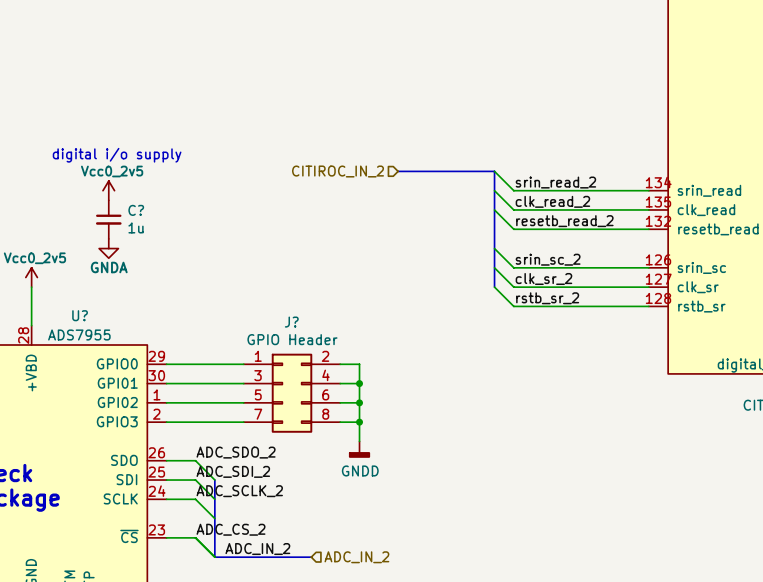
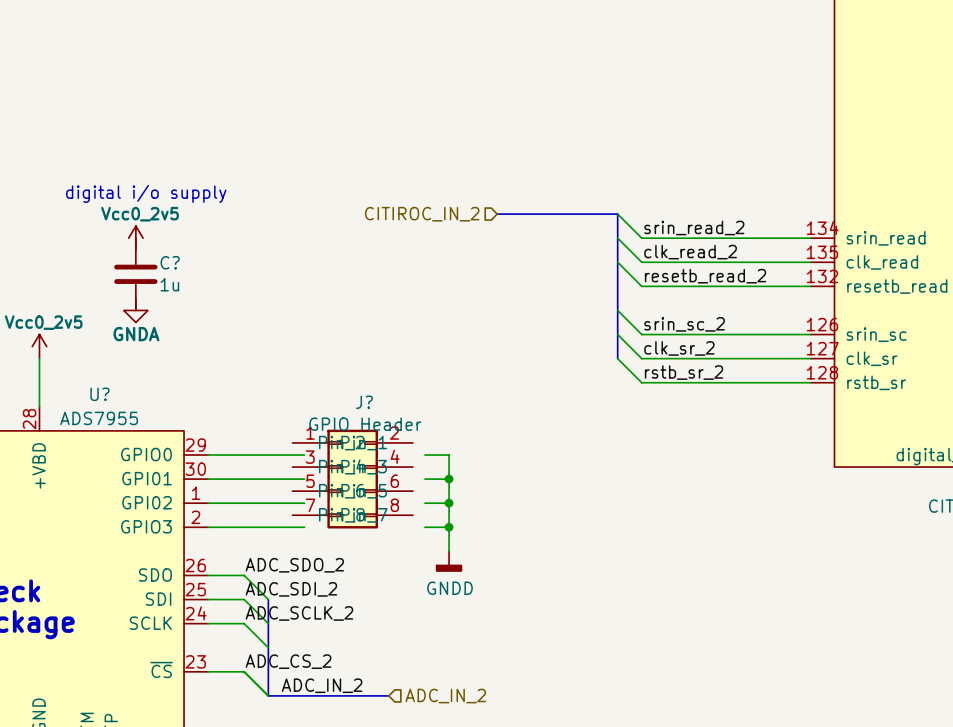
C? symbol: [95, 200, 122, 239] -> [114, 238, 158, 311]
J?: none -> GPIO Header (352, 479)
J?: GPIO Header (292, 393) -> none

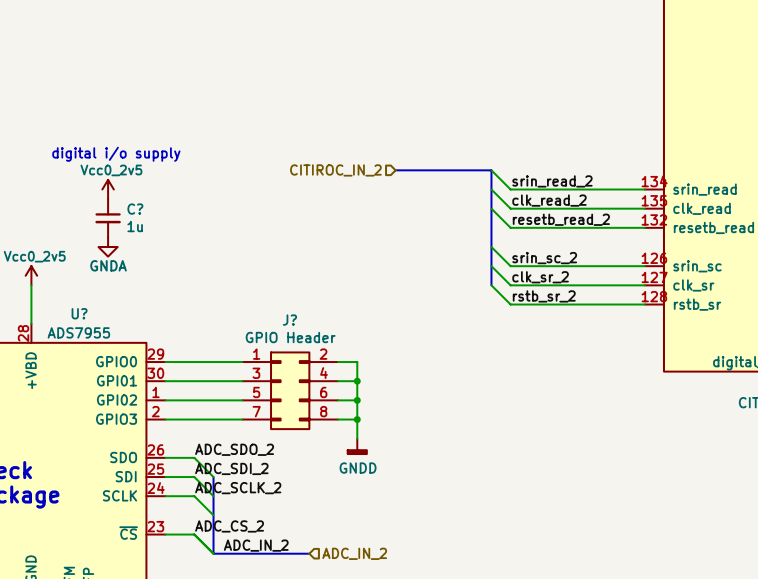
C? symbol: [114, 238, 158, 311] -> [95, 199, 121, 238]
J?: GPIO Header (352, 479) -> none
J?: none -> GPIO Header (290, 390)

